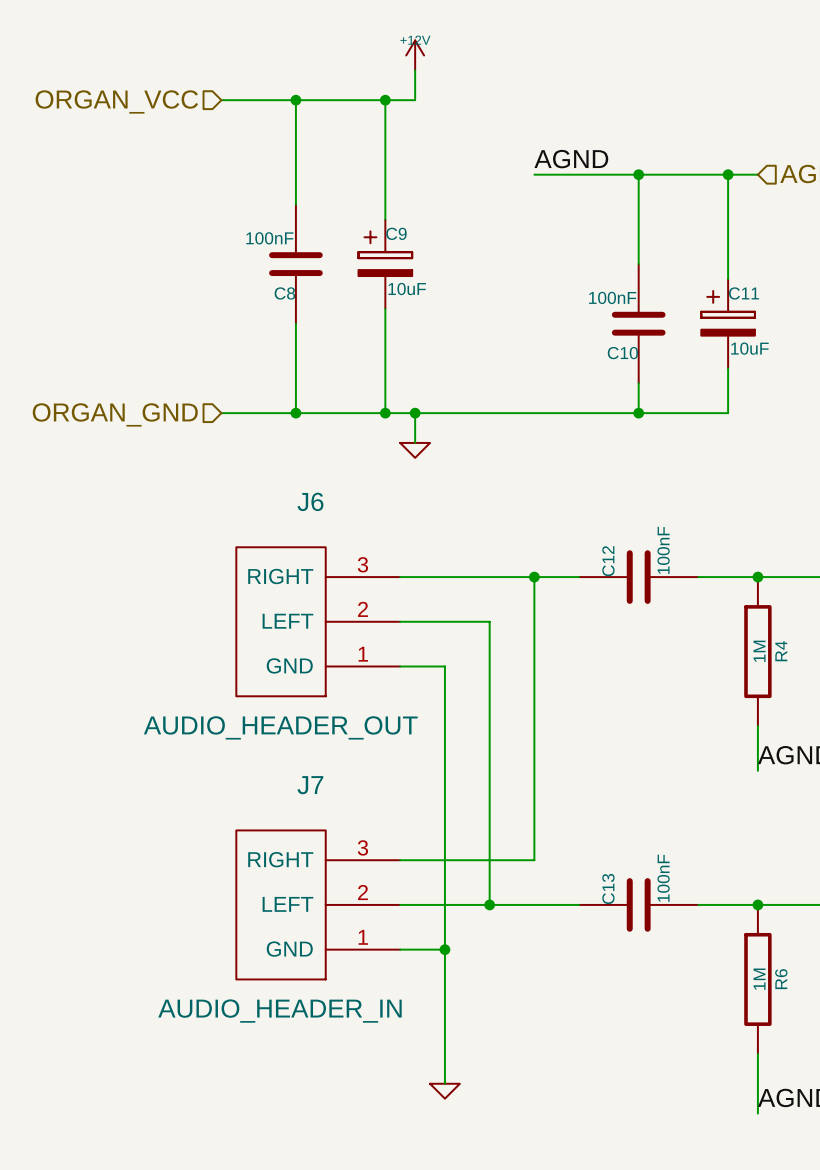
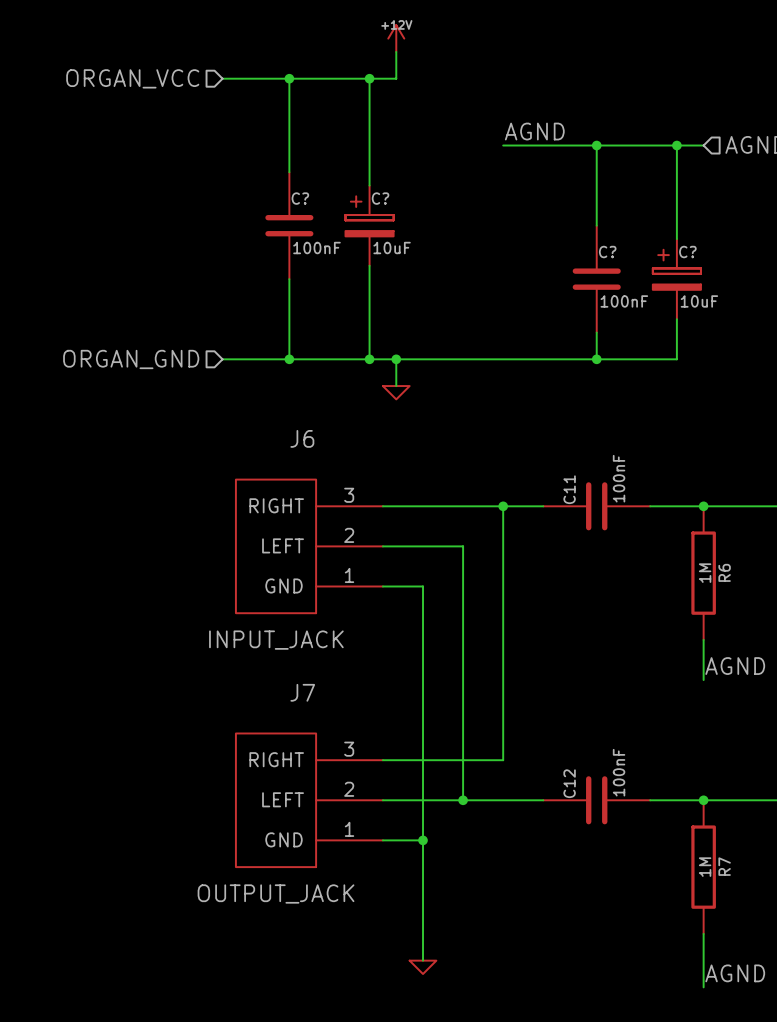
C9 name: C9 (396, 233) -> C? (380, 198)
C8 value position: 100nF (269, 238) -> 100nF (316, 248)
C8 name: C8 (284, 293) -> C? (300, 198)
C11 name: C11 (744, 293) -> C? (687, 252)
C10 value position: 100nF (612, 297) -> 100nF (624, 301)
C10 name: C10 (622, 353) -> C? (607, 252)
C12 name: C12 (608, 561) -> C11 (569, 489)
R4 name: R4 (781, 651) -> R6 (724, 572)
J6 value: AUDIO_HEADER_OUT (280, 727) -> INPUT_JACK (276, 640)
C13 name: C13 (608, 888) -> C12 (569, 783)
R6 name: R6 (781, 979) -> R7 (724, 866)
J7 value: AUDIO_HEADER_IN (279, 1011) -> OUTPUT_JACK (276, 894)

